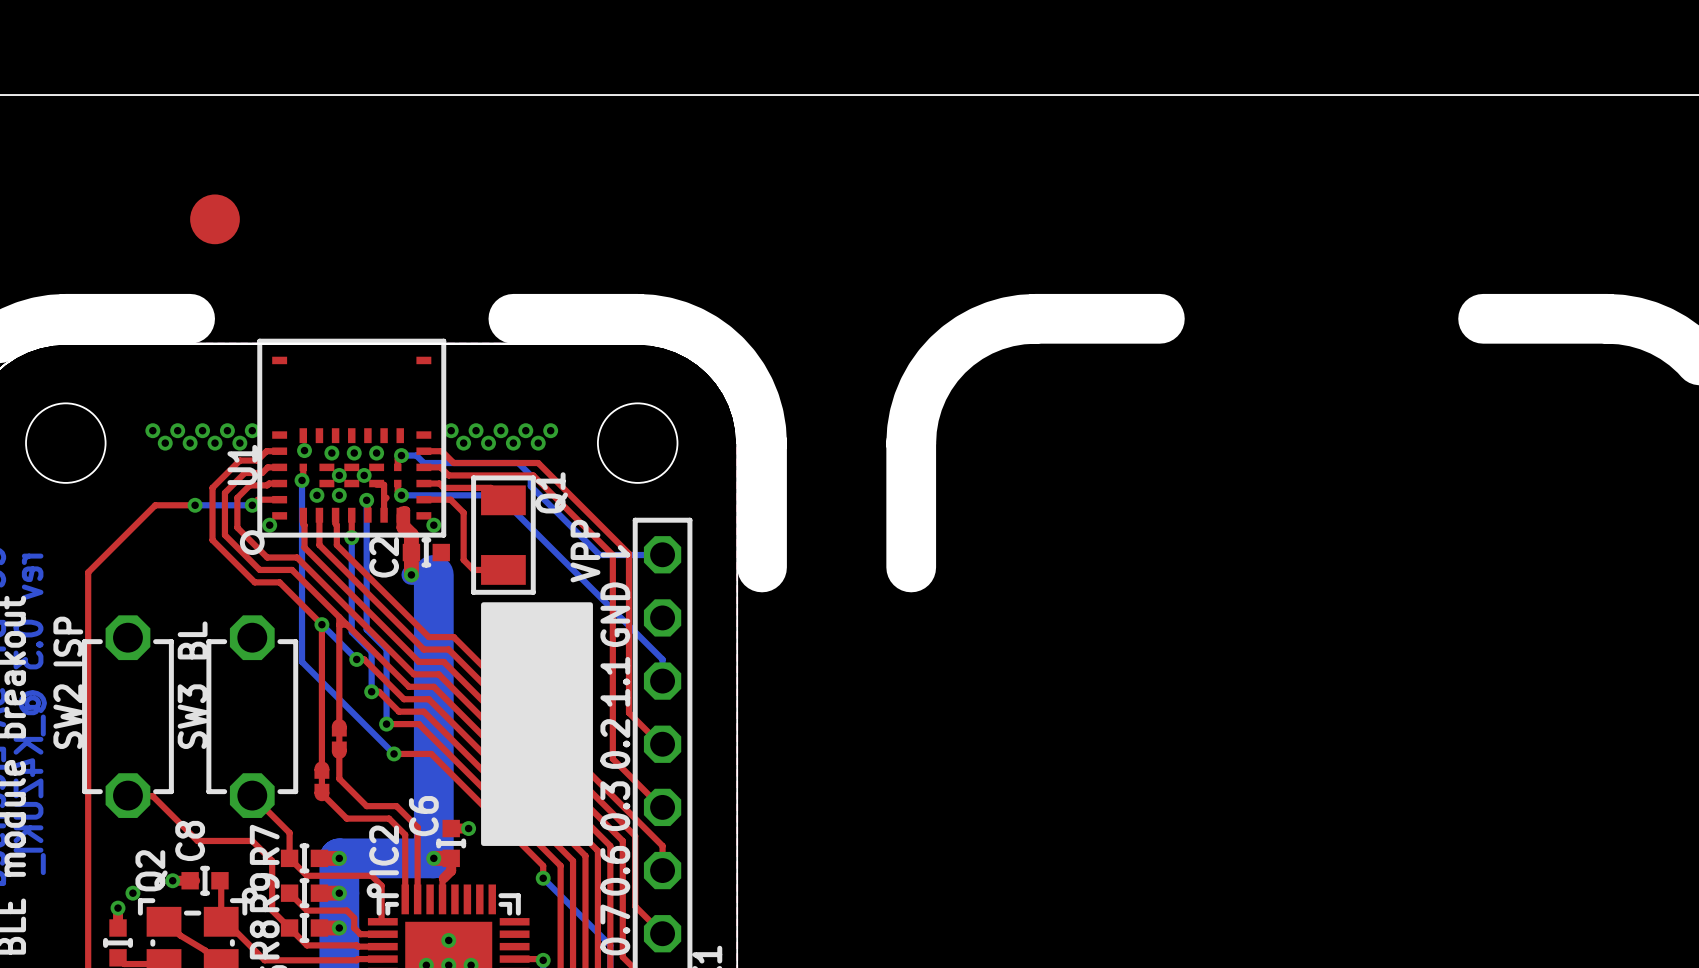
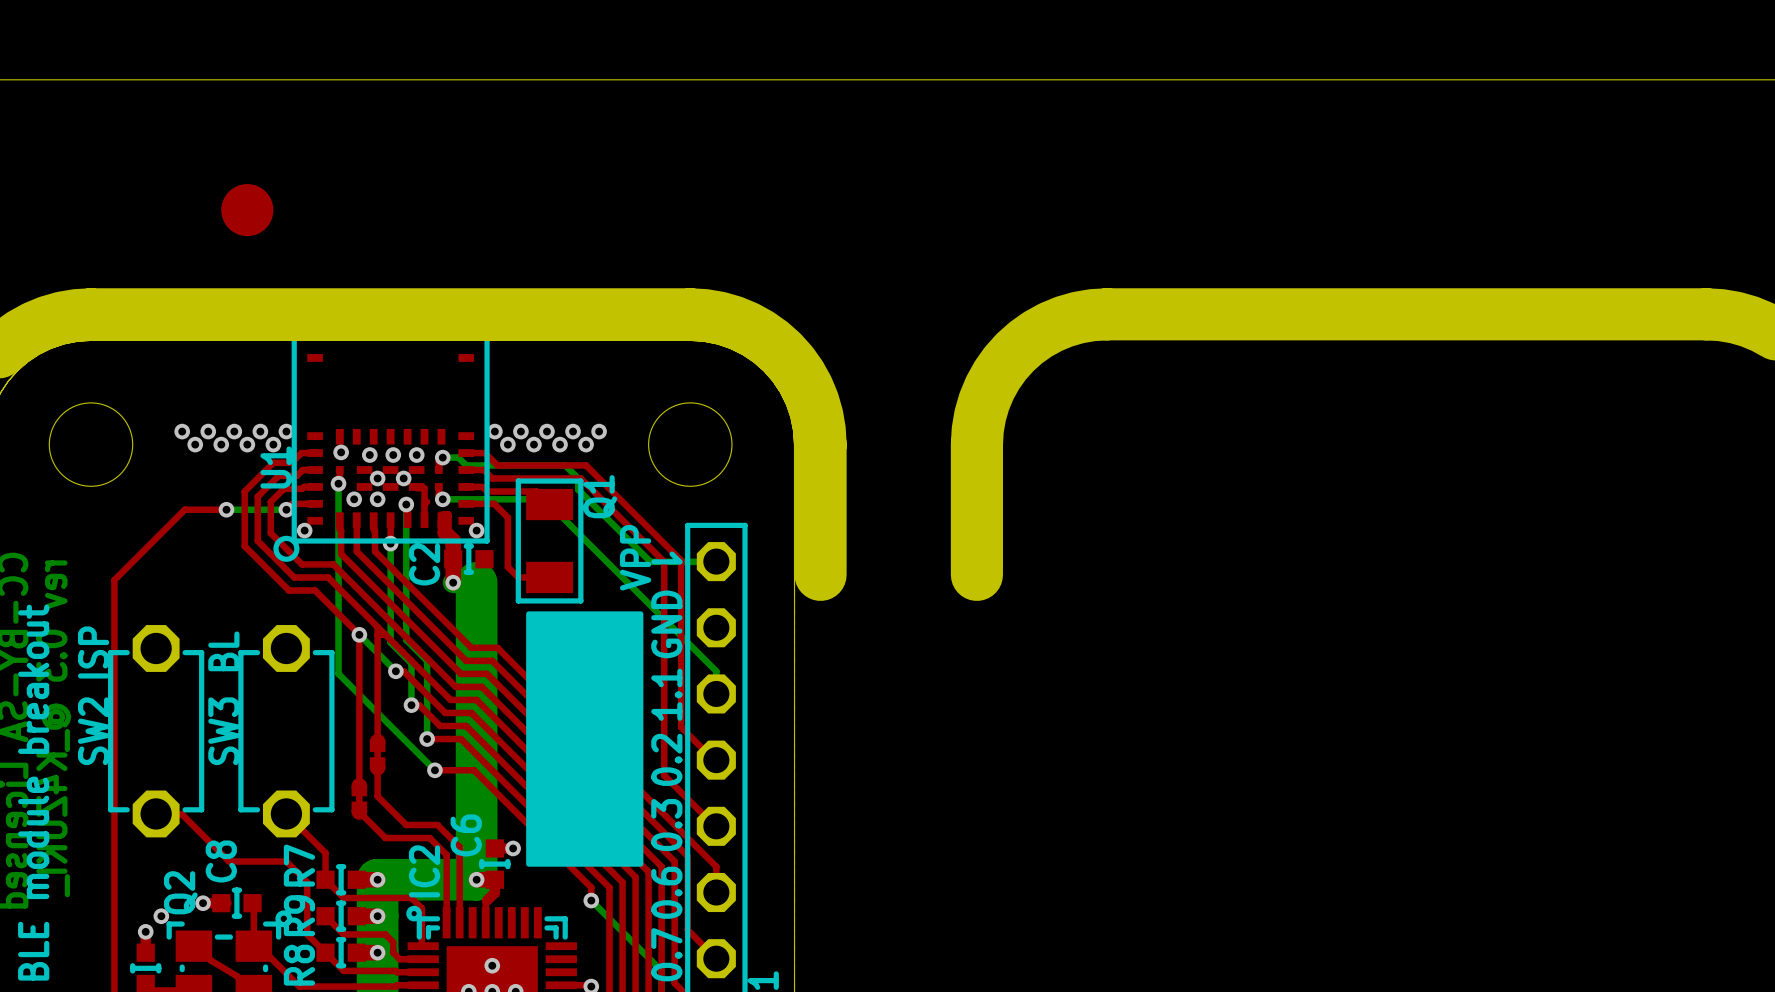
board edge: none -> (221, 314) (560, 314)
board edge: none -> (1237, 314) (1576, 314)

